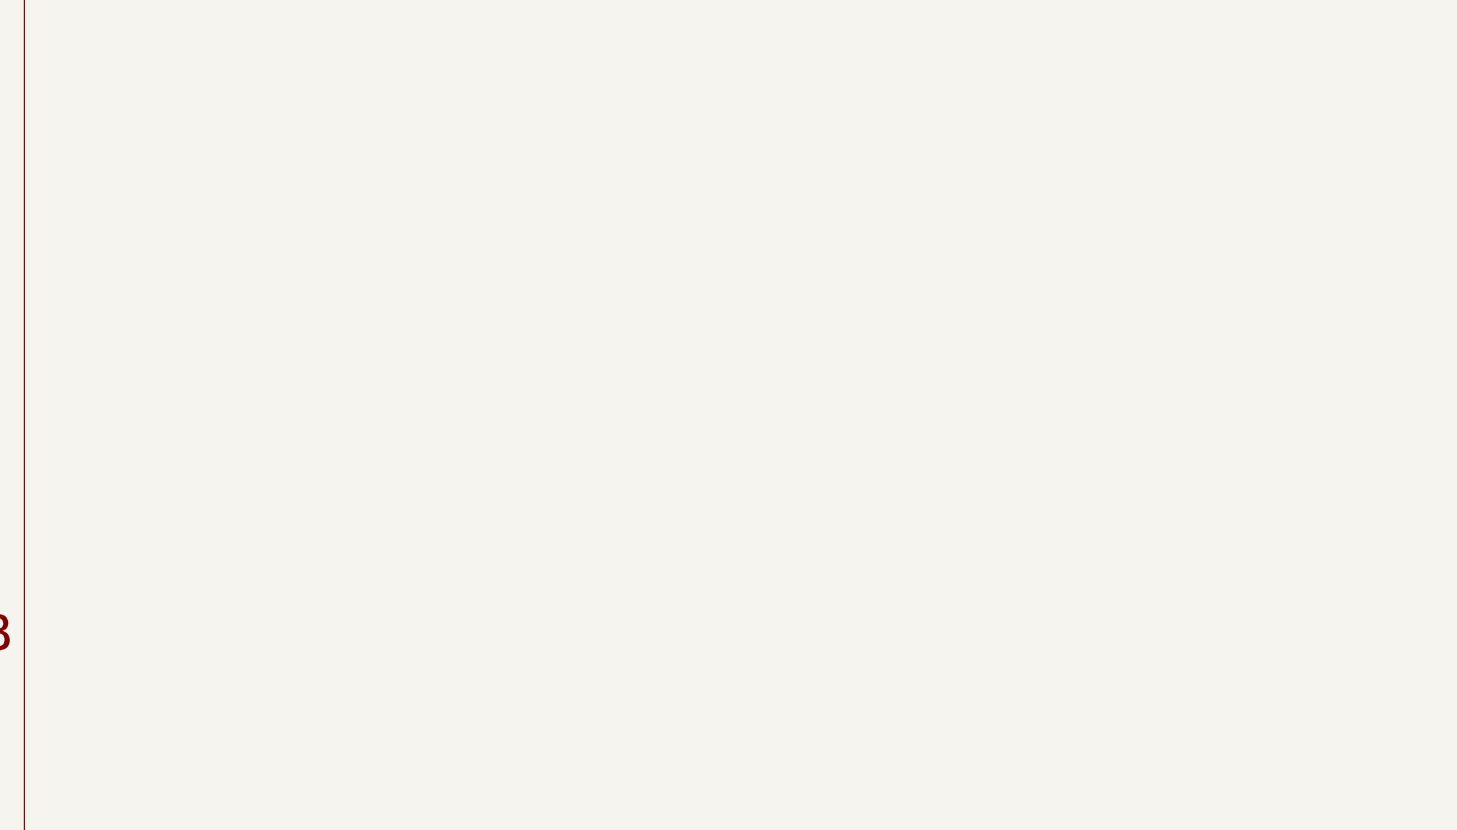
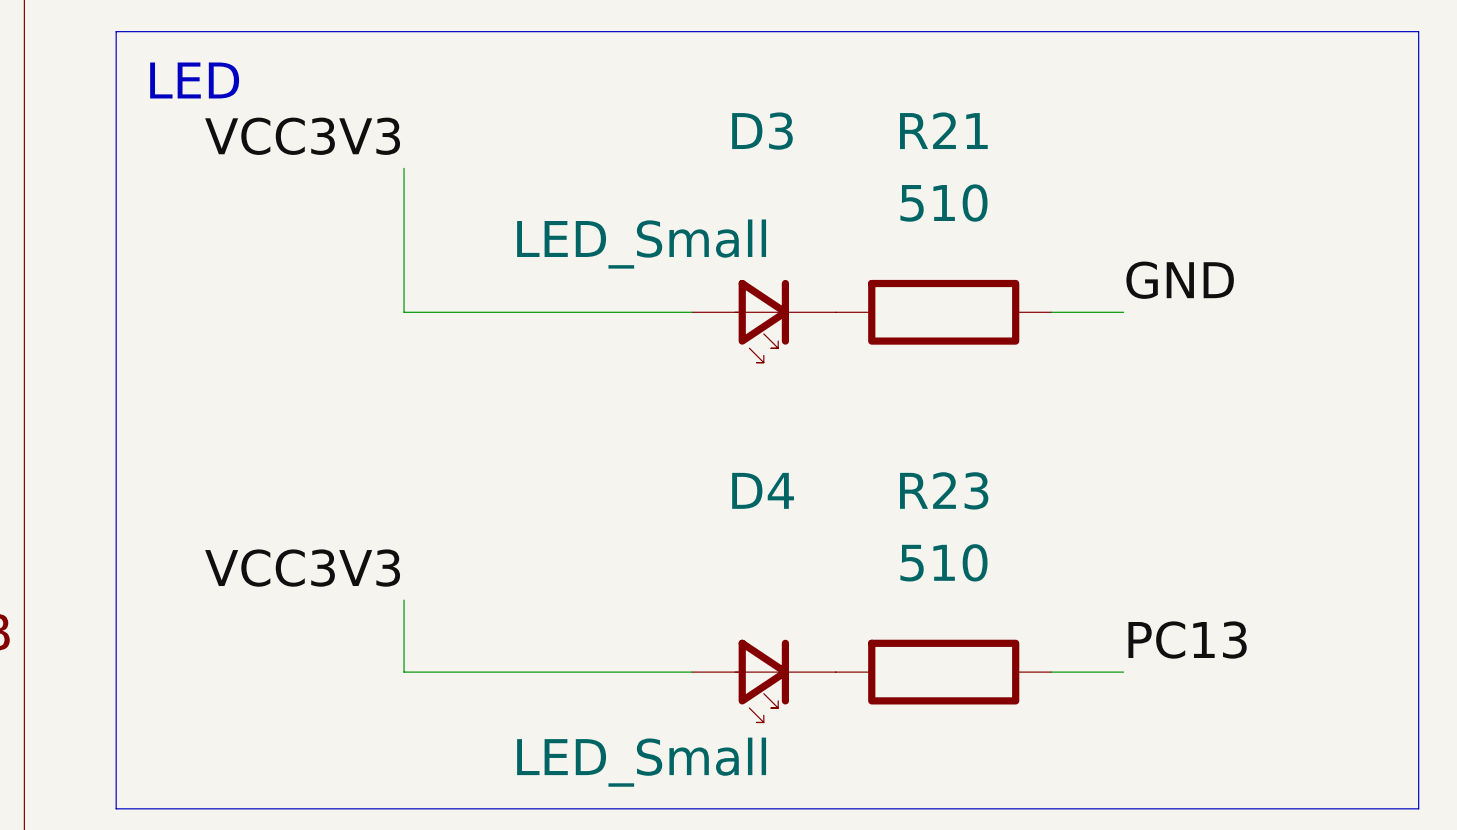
line: none -> (116, 31) (1418, 31) (1418, 808) (116, 808) (116, 31)
text: none -> LED (194, 80)
label: none -> VCC3V3 (302, 136)
wire: none -> (404, 168) (404, 312) (691, 312)
label: none -> GND (1180, 280)
R21: none -> 510 (943, 312)
wire: none -> (1051, 312) (1123, 312)
D3: none -> LED_Small (763, 321)
label: none -> VCC3V3 (302, 568)
wire: none -> (404, 600) (404, 672) (691, 672)
label: none -> PC13 (1187, 640)
R23: none -> 510 (943, 672)
wire: none -> (1051, 672) (1123, 672)
D4: none -> LED_Small (763, 681)

